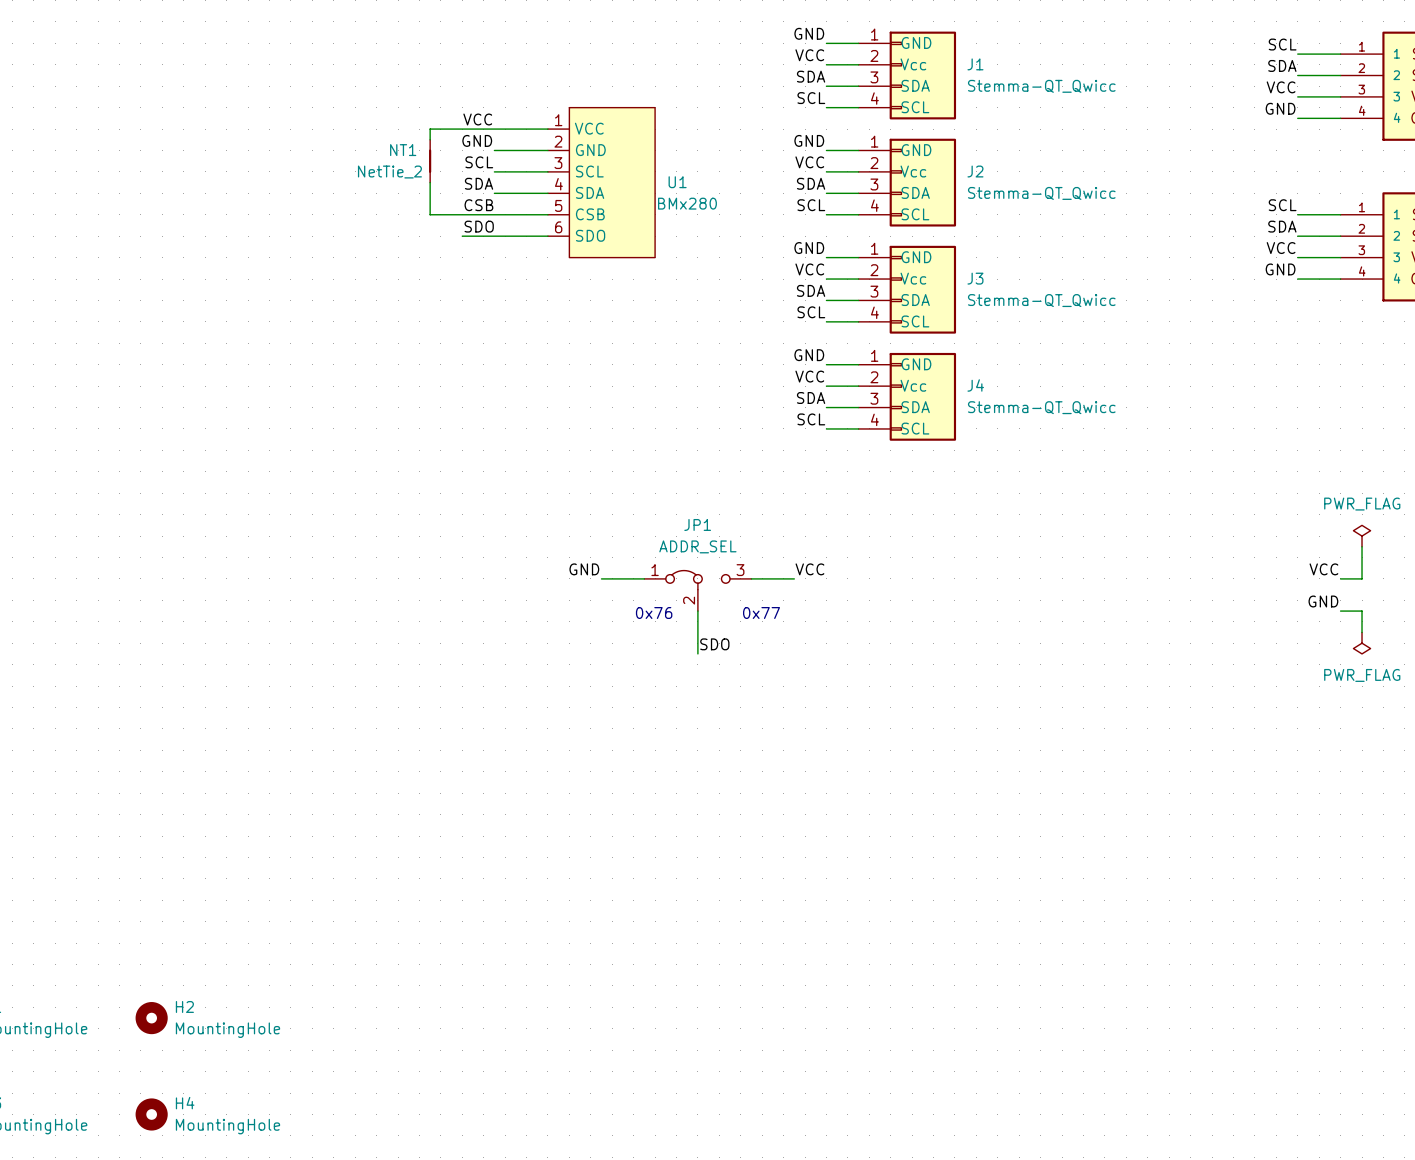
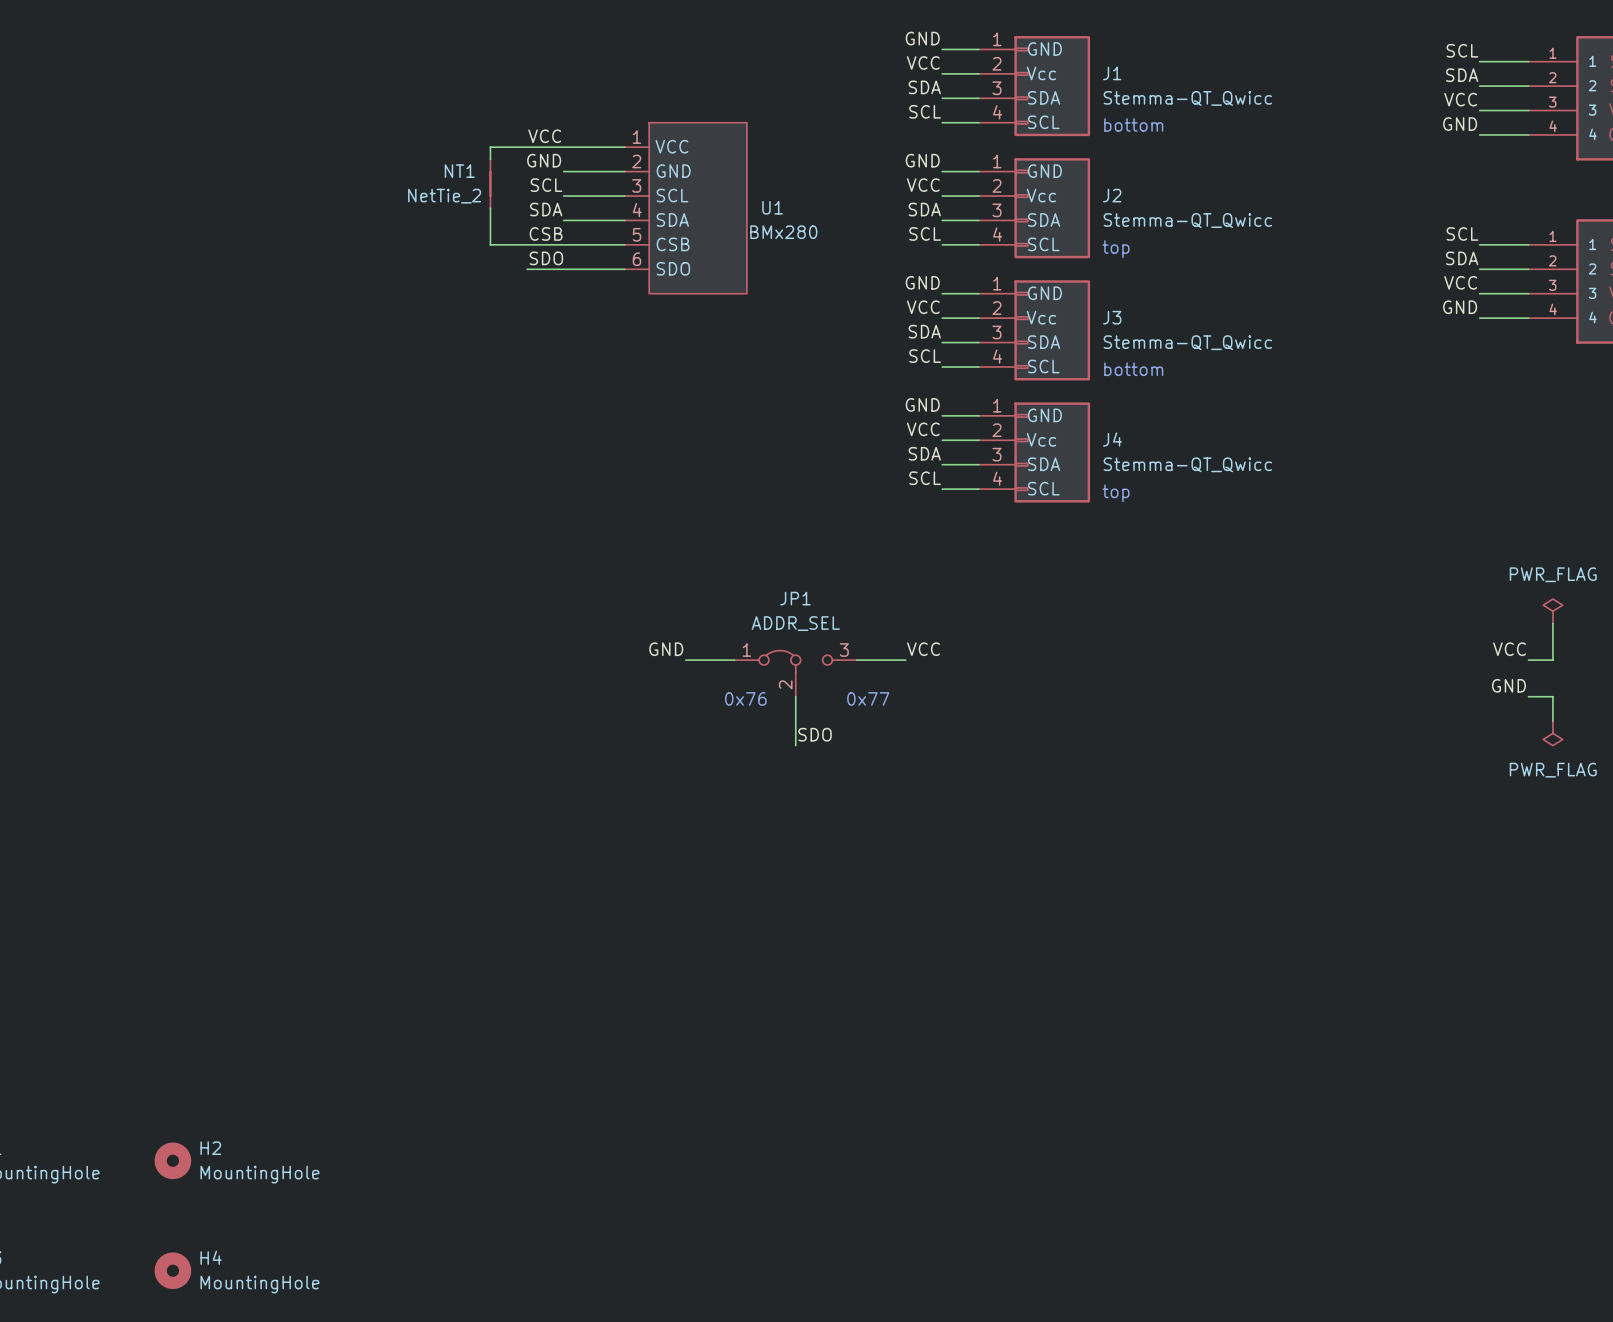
text: none -> bottom (1133, 124)
text: none -> top (1116, 249)
text: none -> bottom (1133, 369)
text: none -> top (1116, 493)

